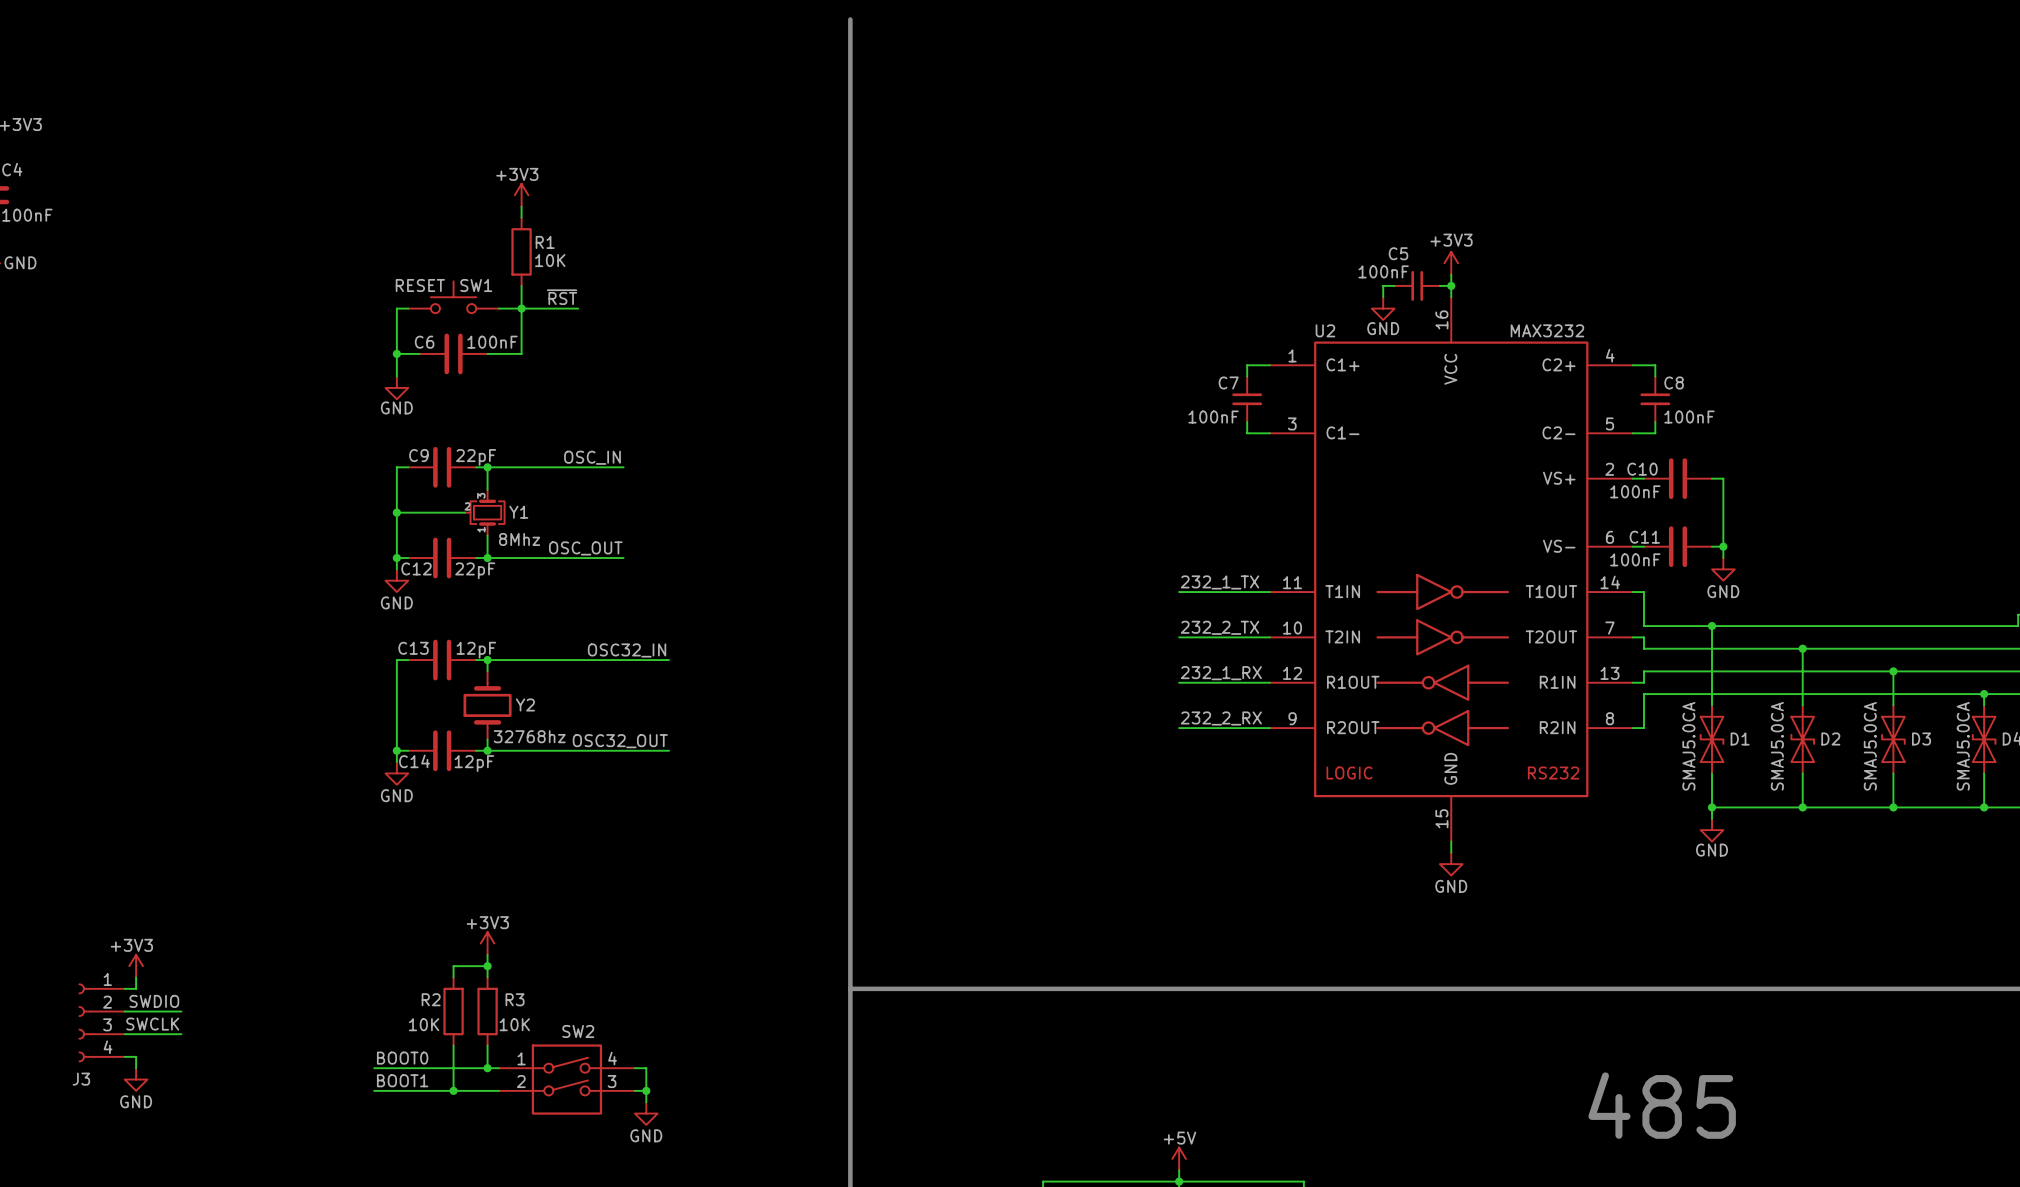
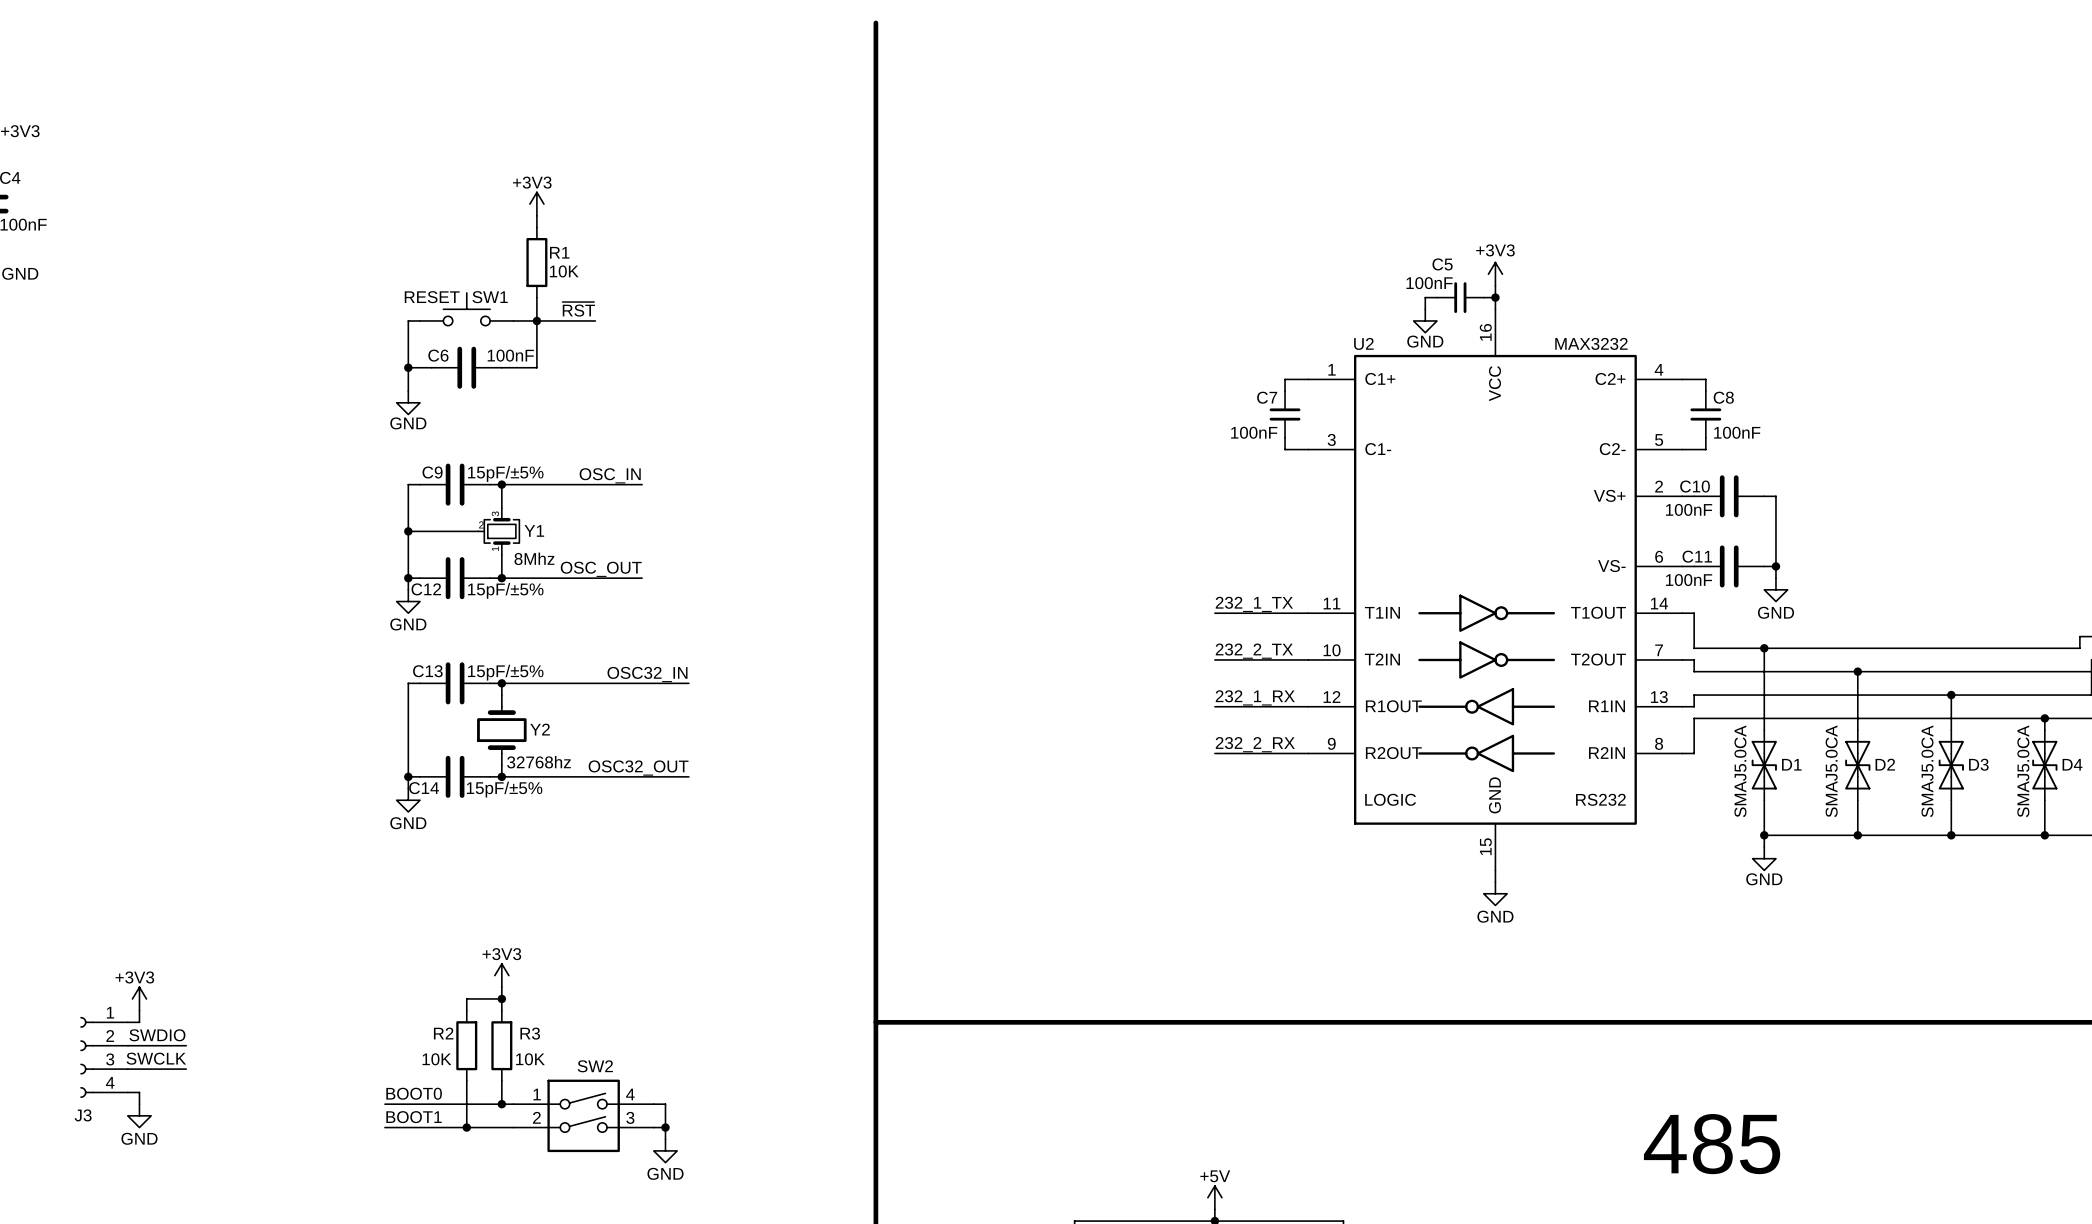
C9 value: 22pF (476, 457) -> 15pF/±5% (505, 473)
C12 value: 22pF (475, 570) -> 15pF/±5% (505, 590)
C13 value: 12pF (476, 650) -> 15pF/±5% (505, 672)
C14 value: 12pF (474, 763) -> 15pF/±5% (504, 789)

